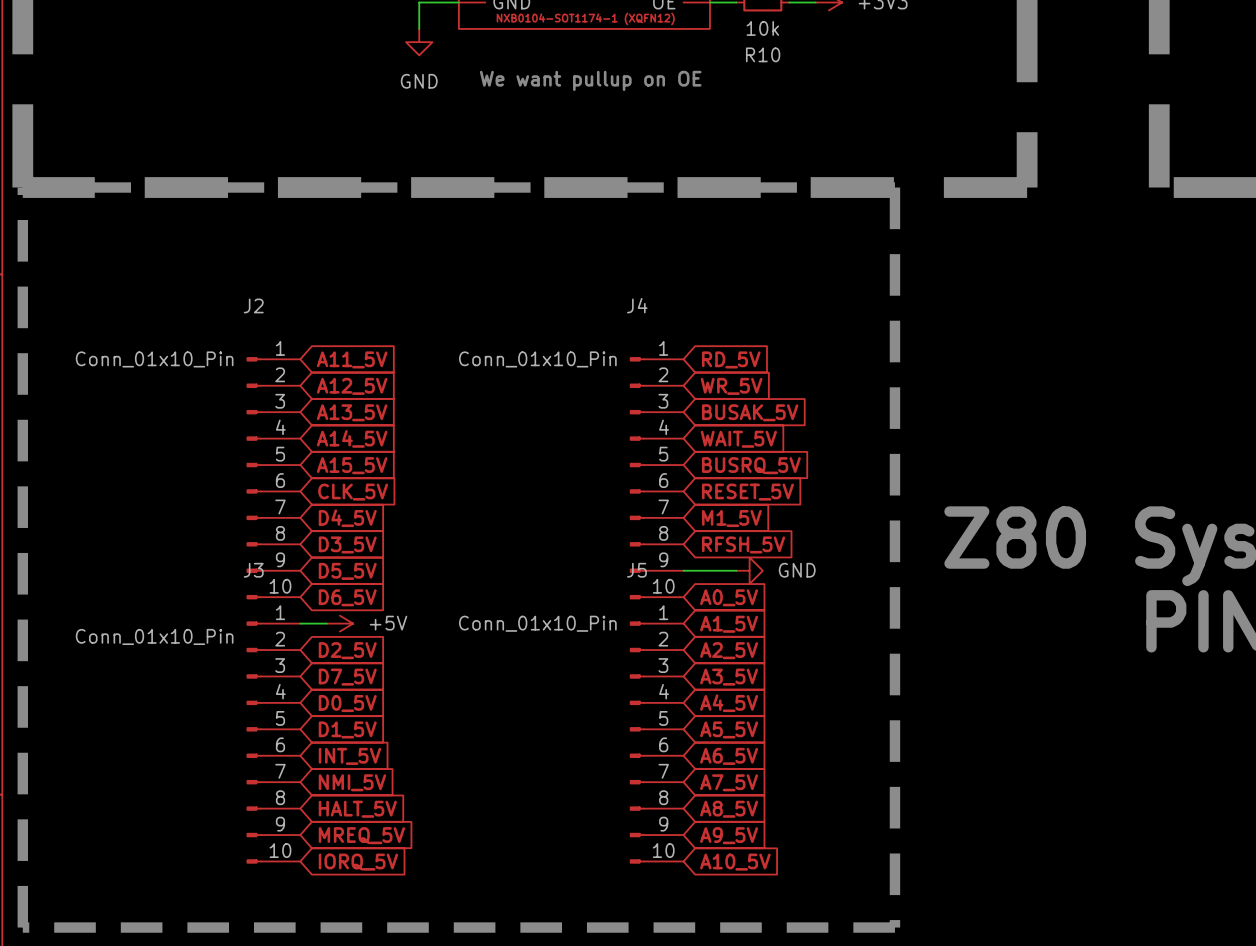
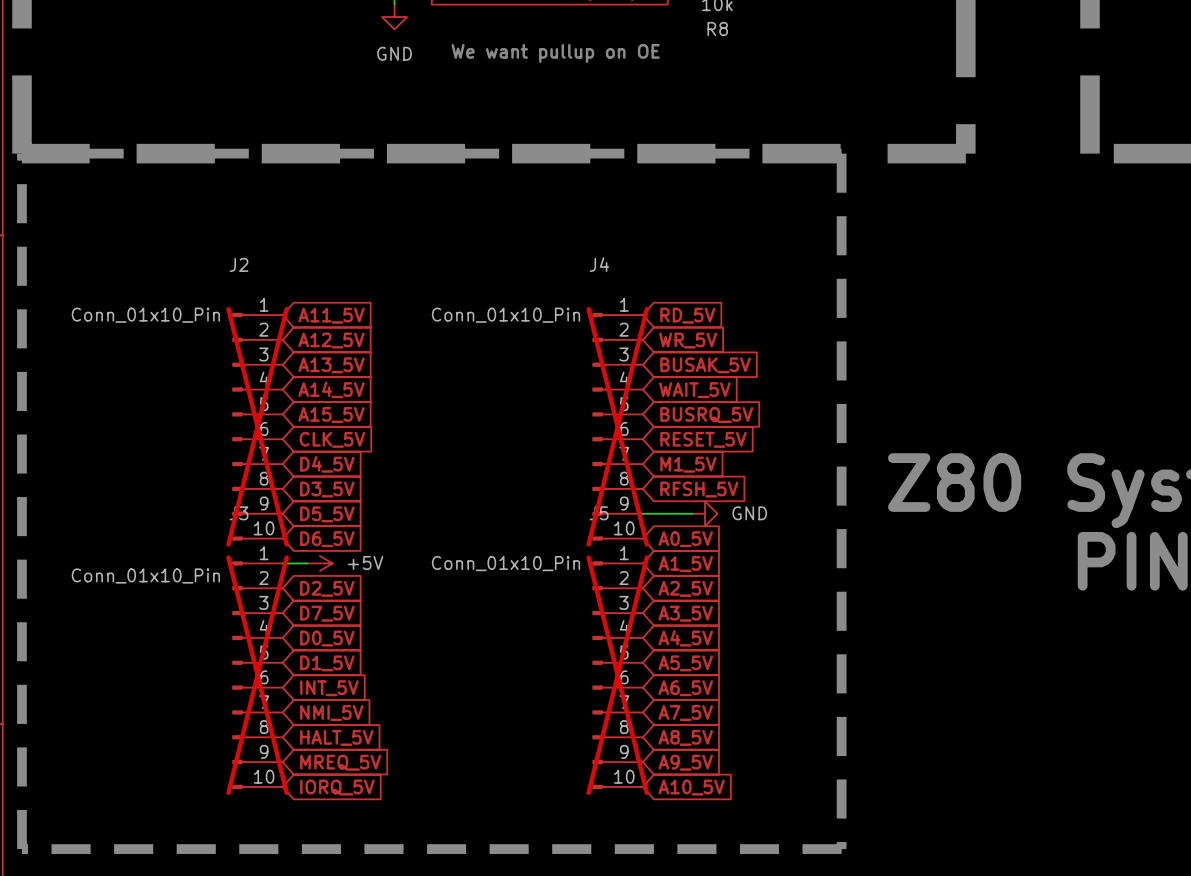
R10 name: R10 (763, 54) -> R8 (717, 28)
J2 do-not-place cross: none -> (257, 426)
J4 do-not-place cross: none -> (617, 426)
J3 do-not-place cross: none -> (257, 675)
J5 do-not-place cross: none -> (617, 675)

